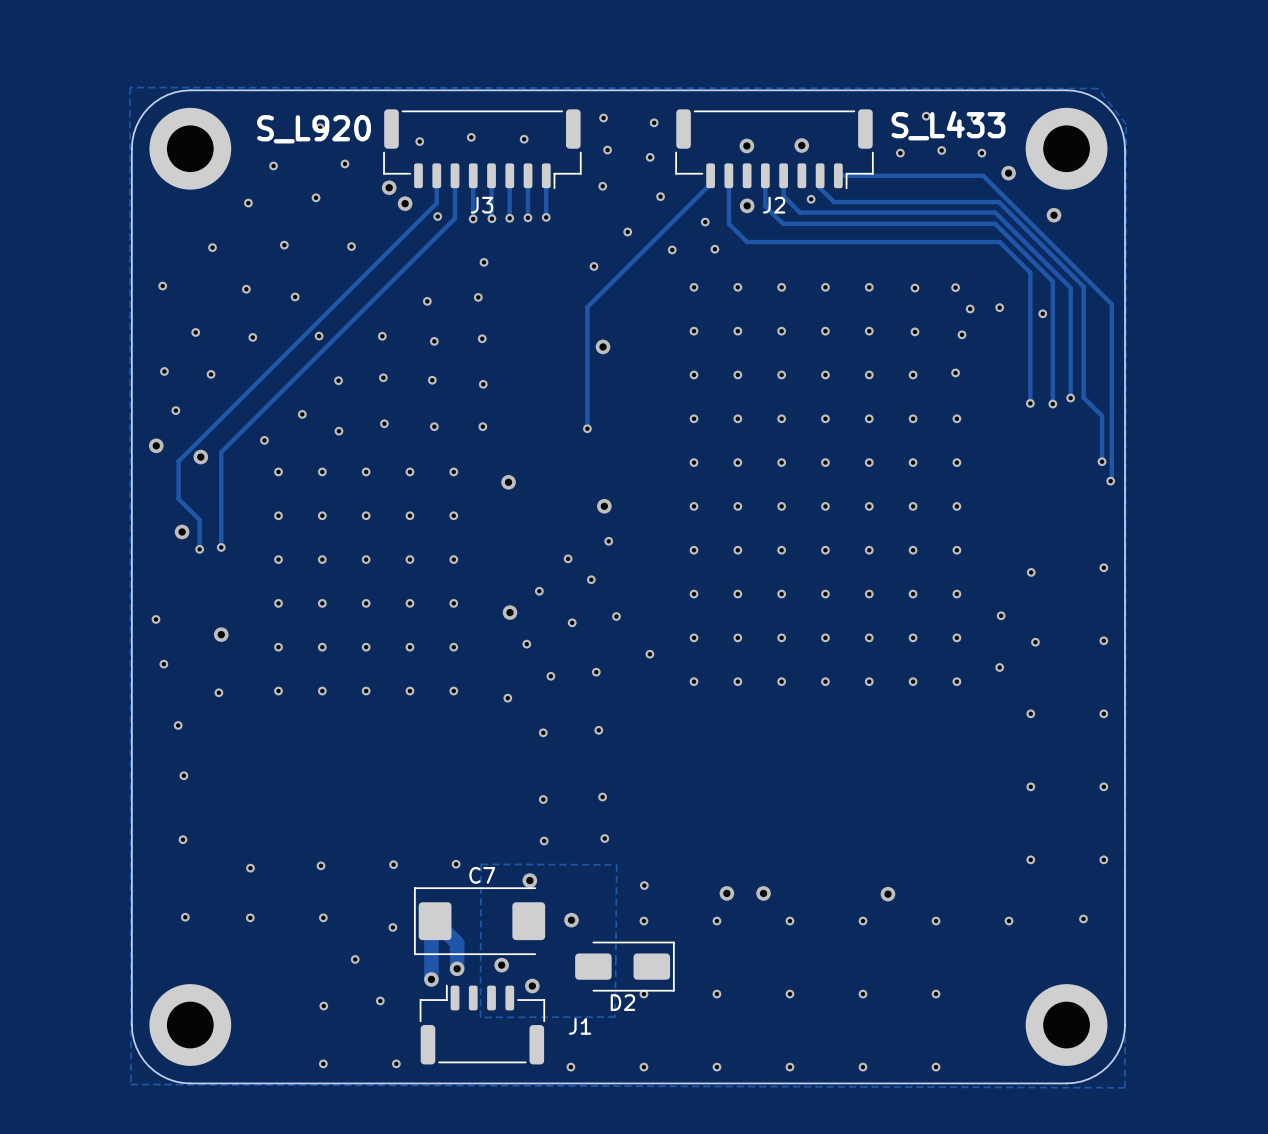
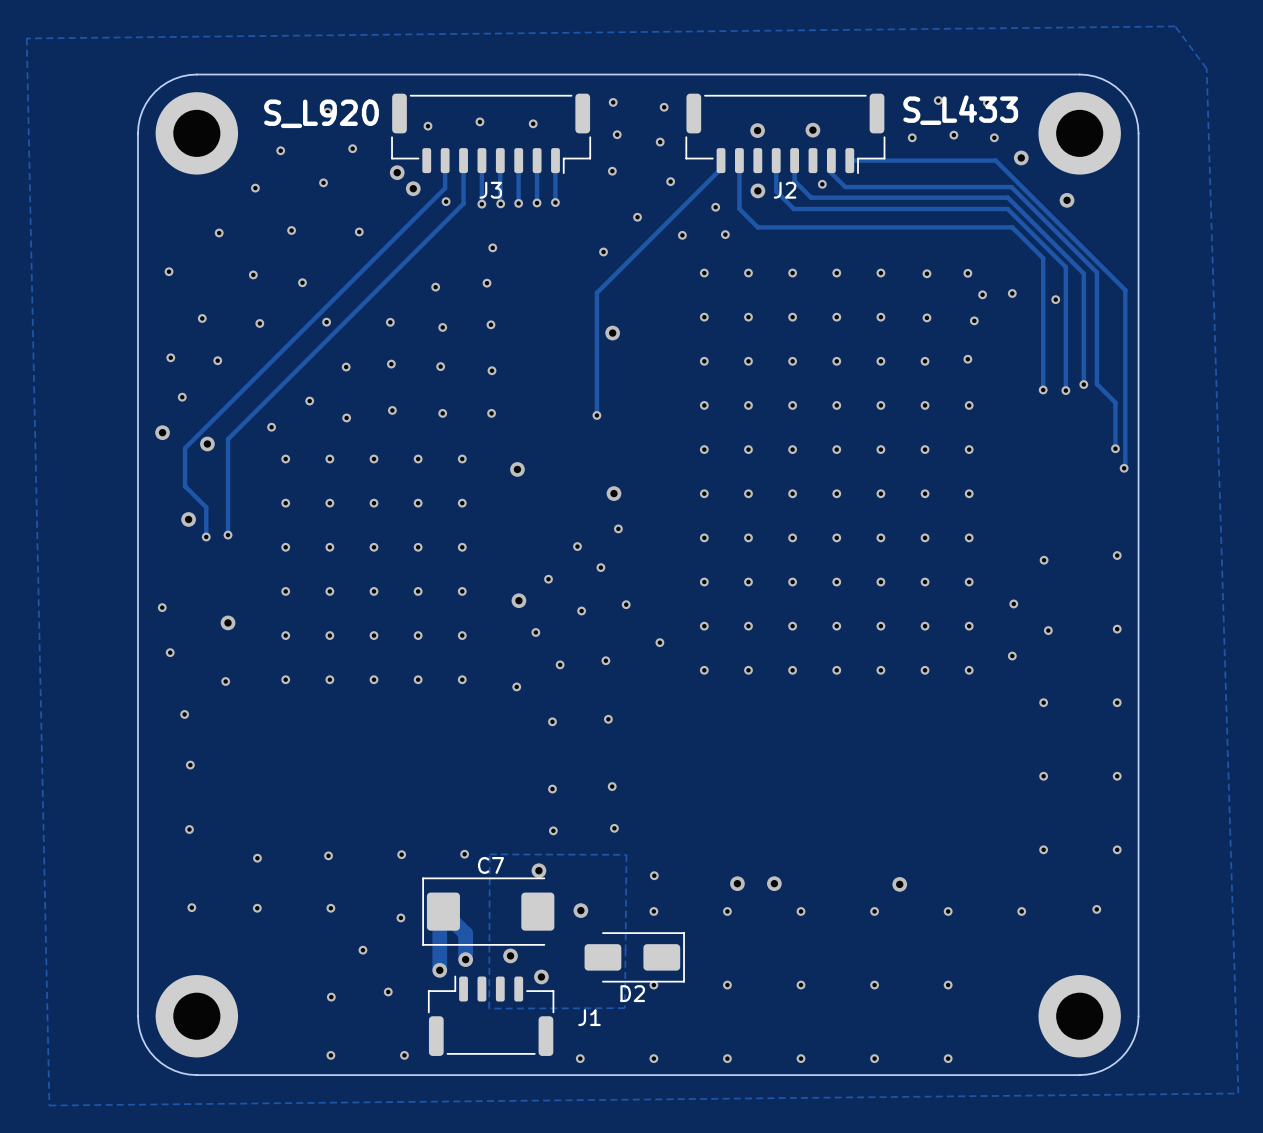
zone outline: (129, 87) (1097, 88) (1126, 124) (1124, 1087) (131, 1084) (129, 87) -> (1175, 26) (1206, 68) (1238, 1093) (49, 1105) (26, 38) (1175, 26)

